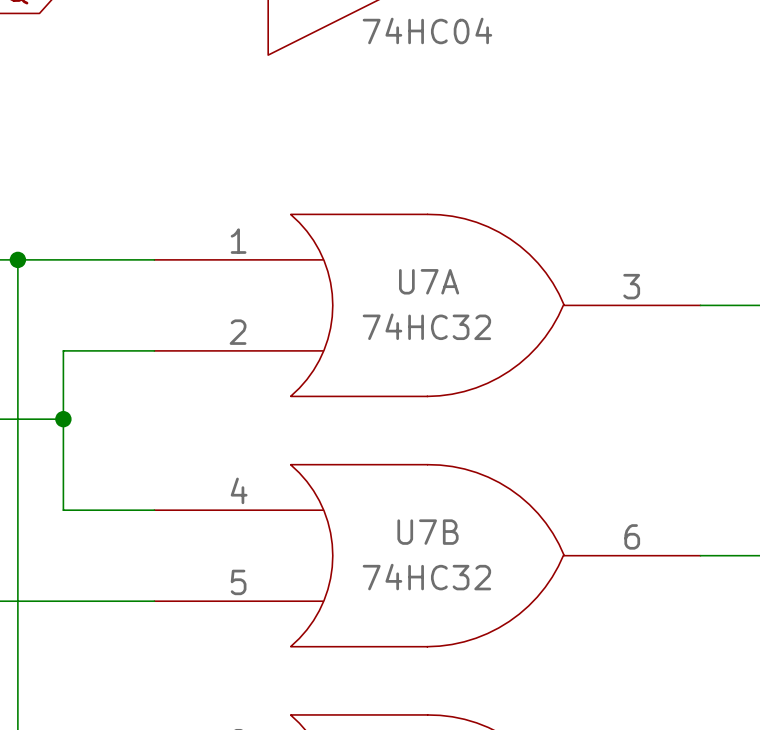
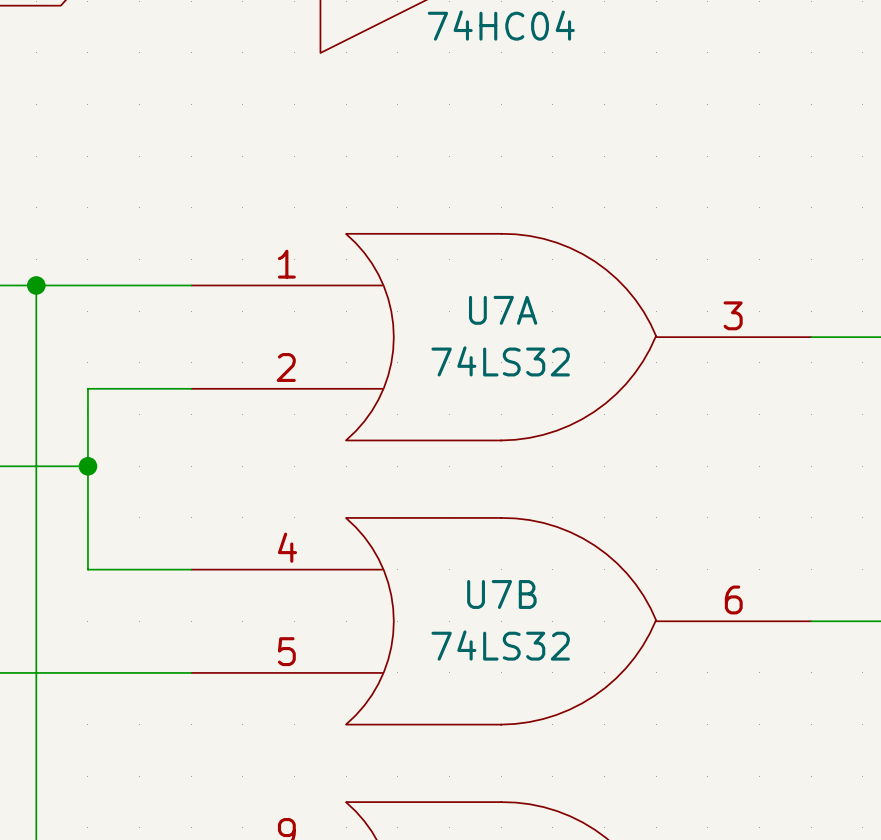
U7A value: 74HC32 (426, 326) -> 74LS32 (500, 361)
U7B value: 74HC32 (426, 577) -> 74LS32 (500, 645)

